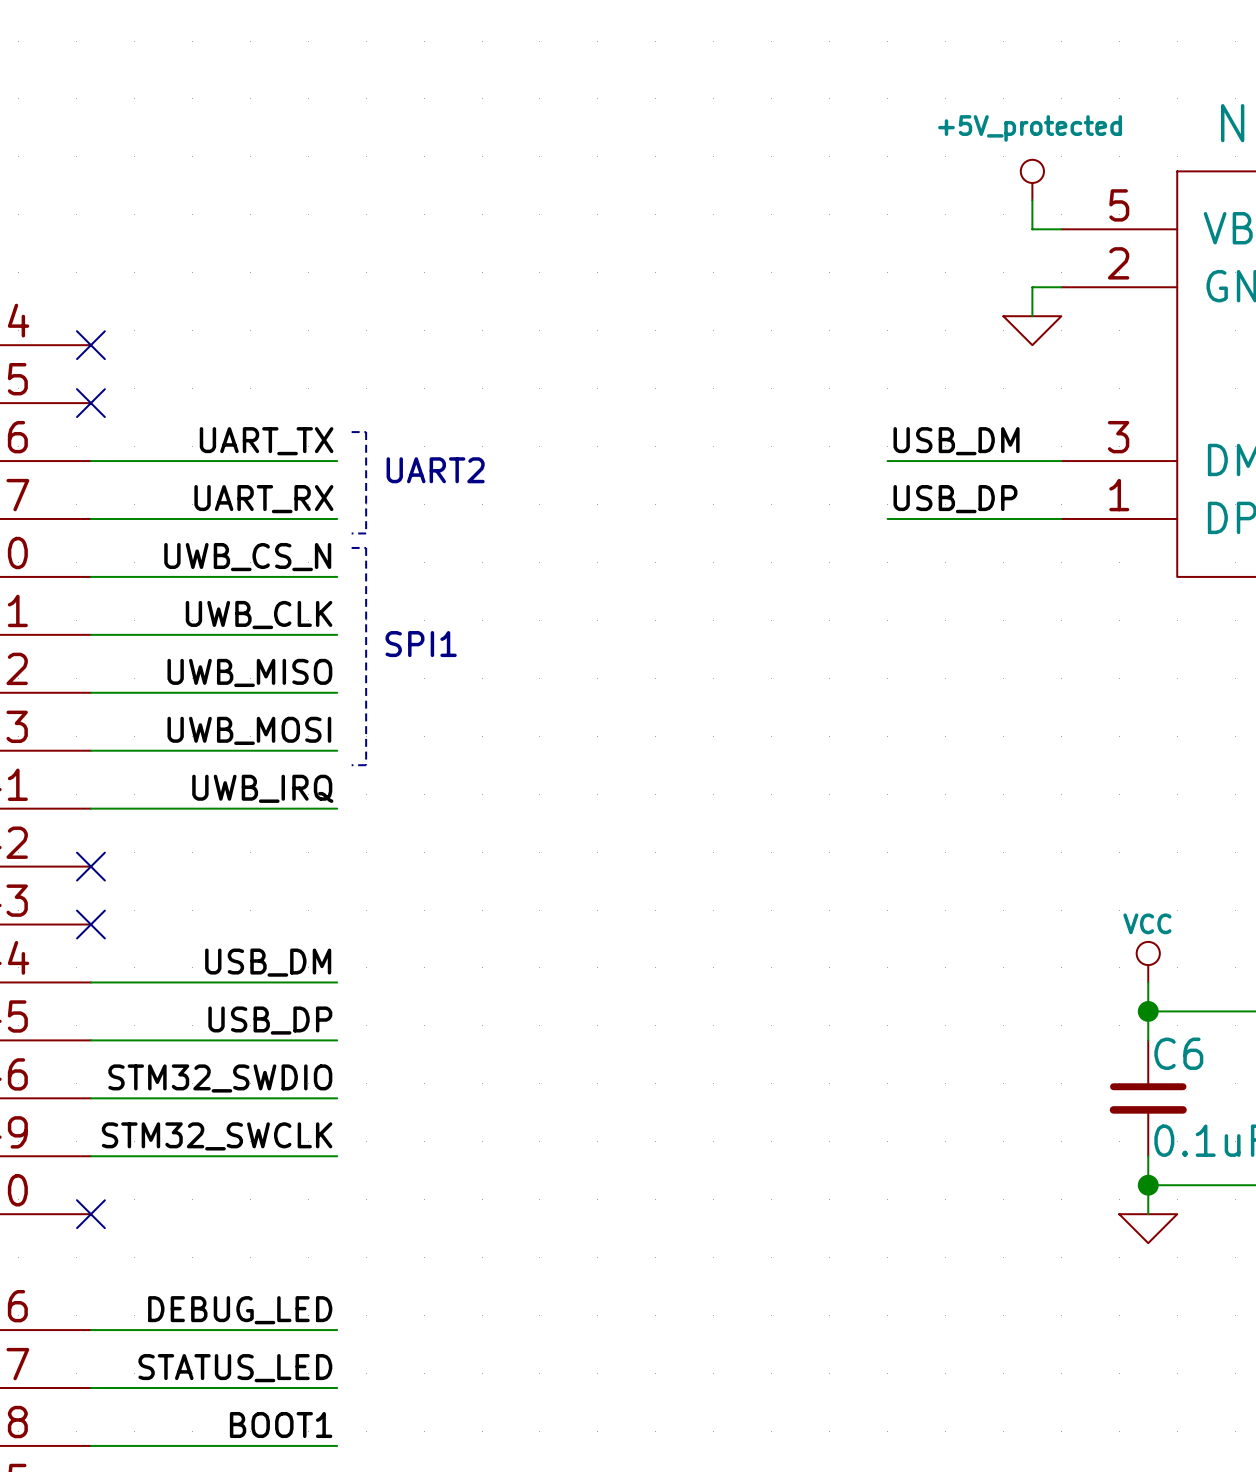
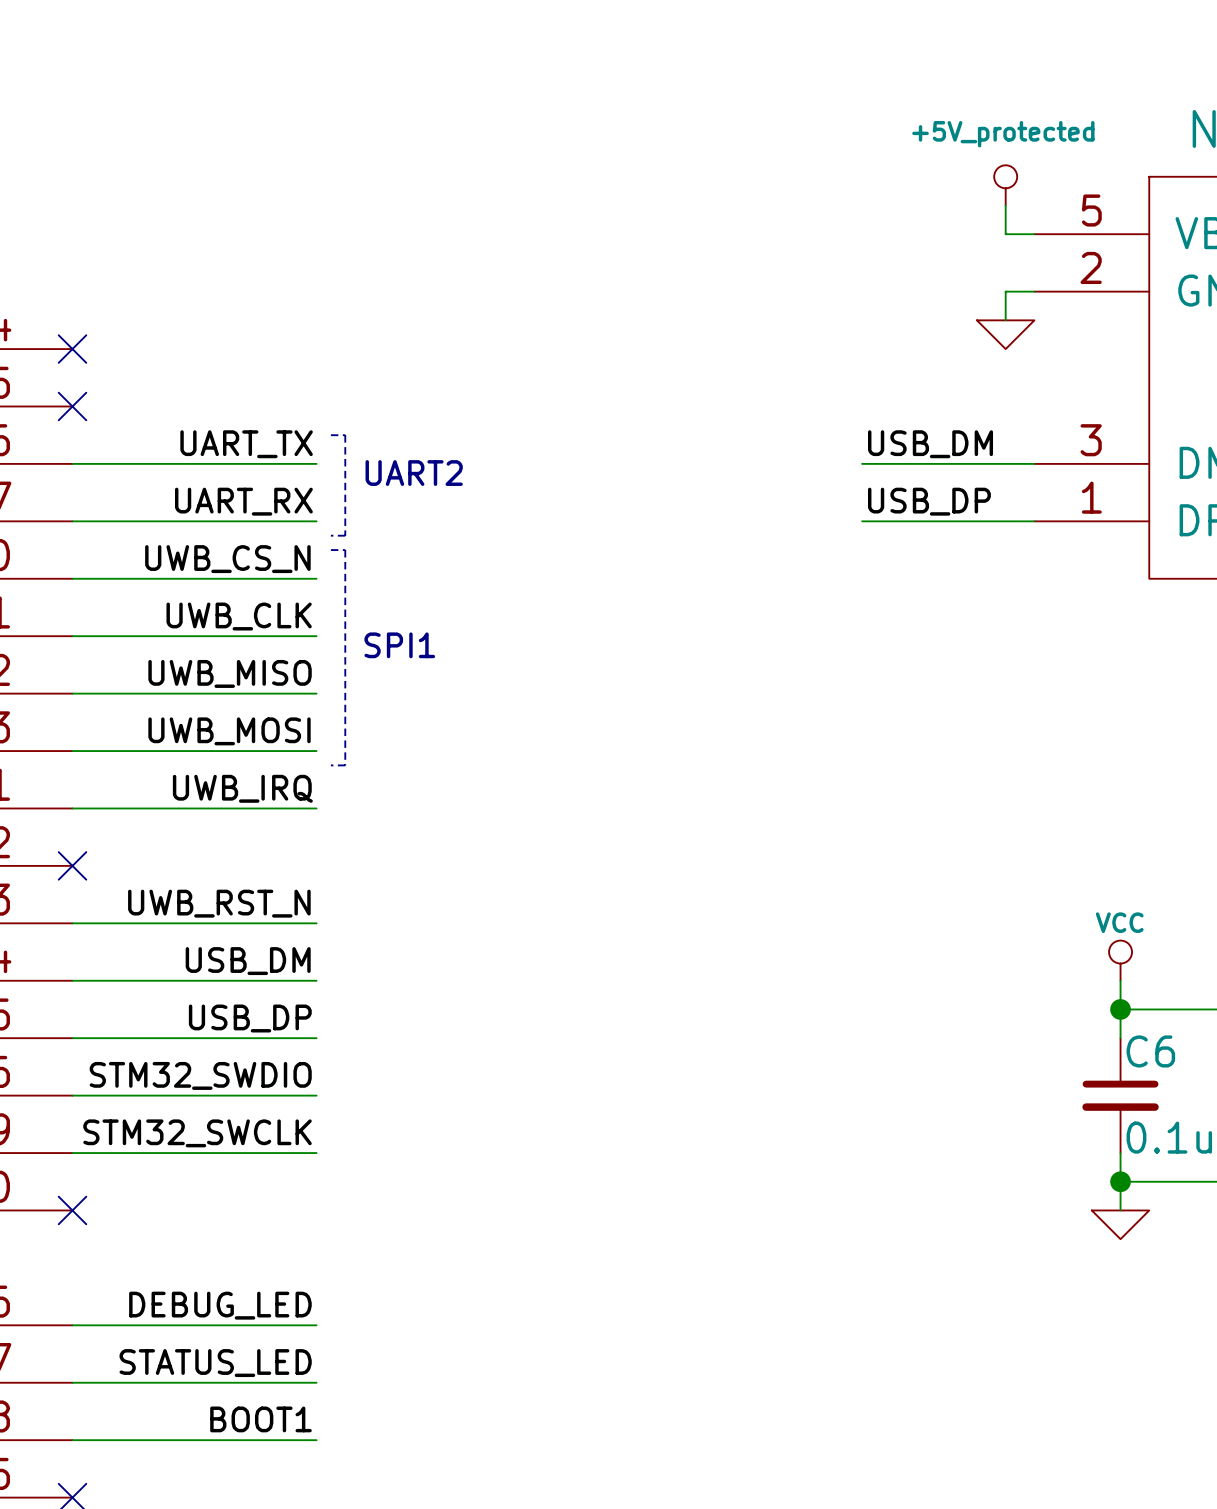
label: none -> UWB_RST_N (219, 903)
wire: none -> (72, 923) (316, 923)
no-connect mark: (90, 924) -> none

